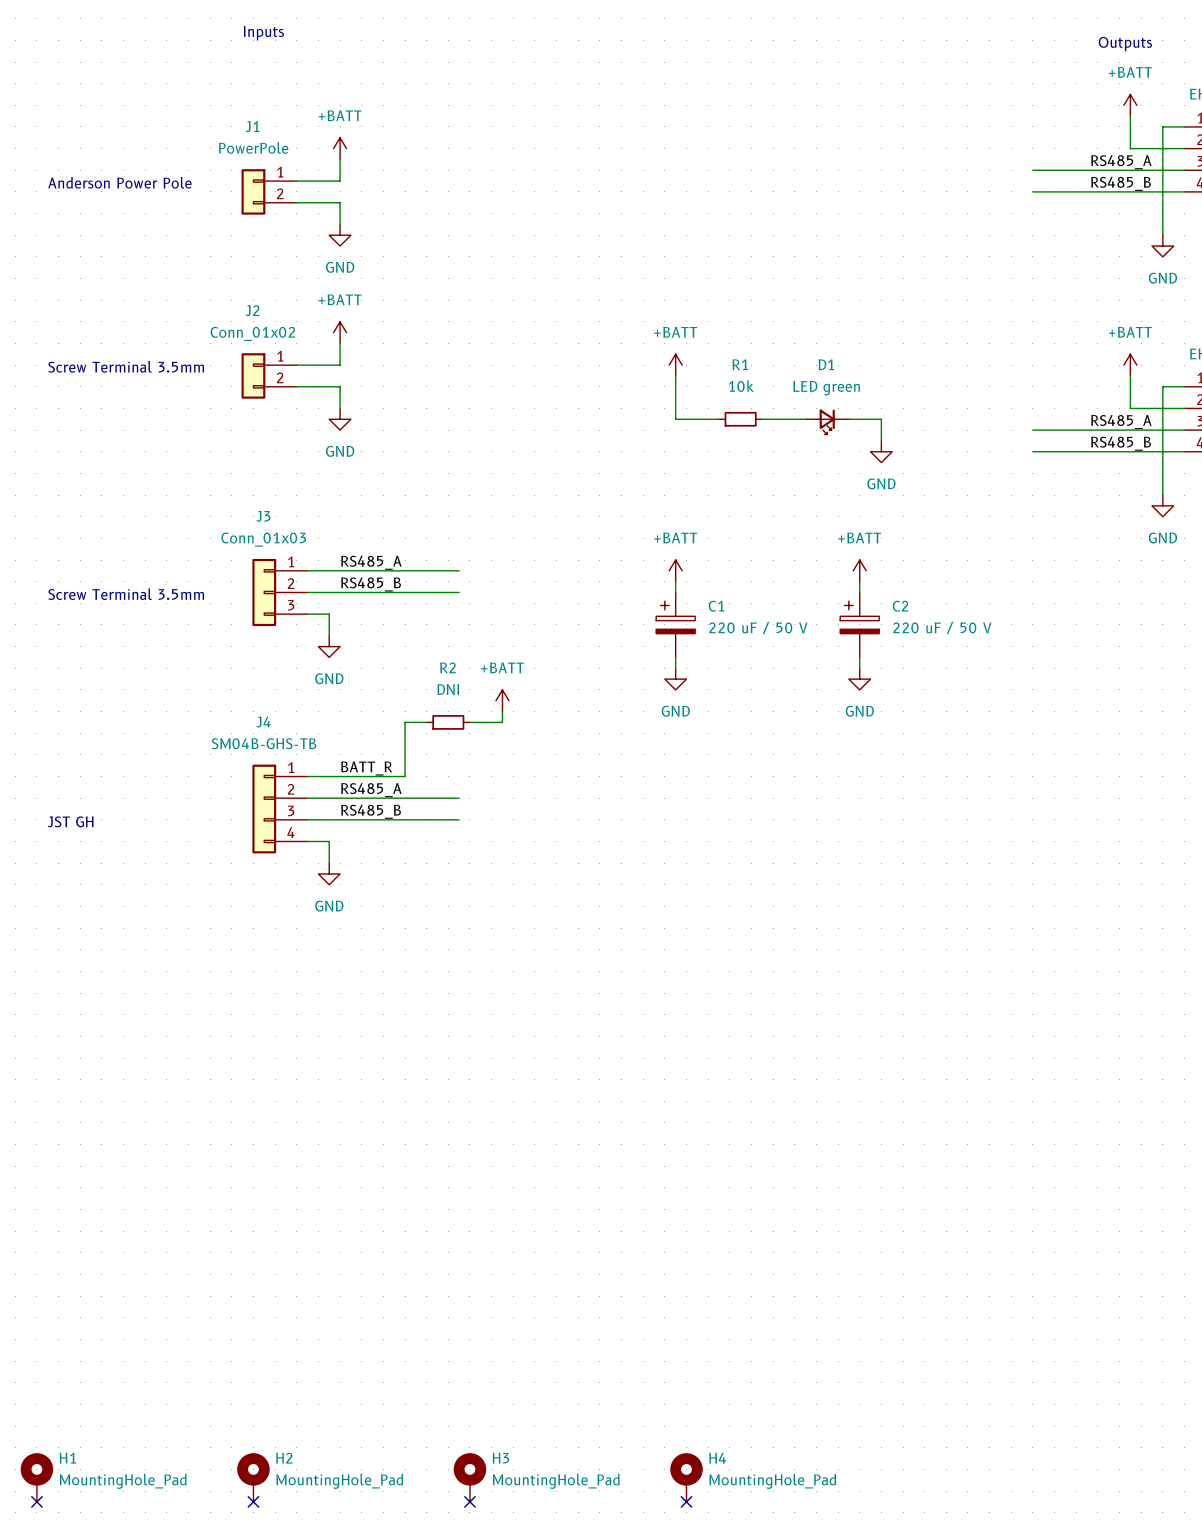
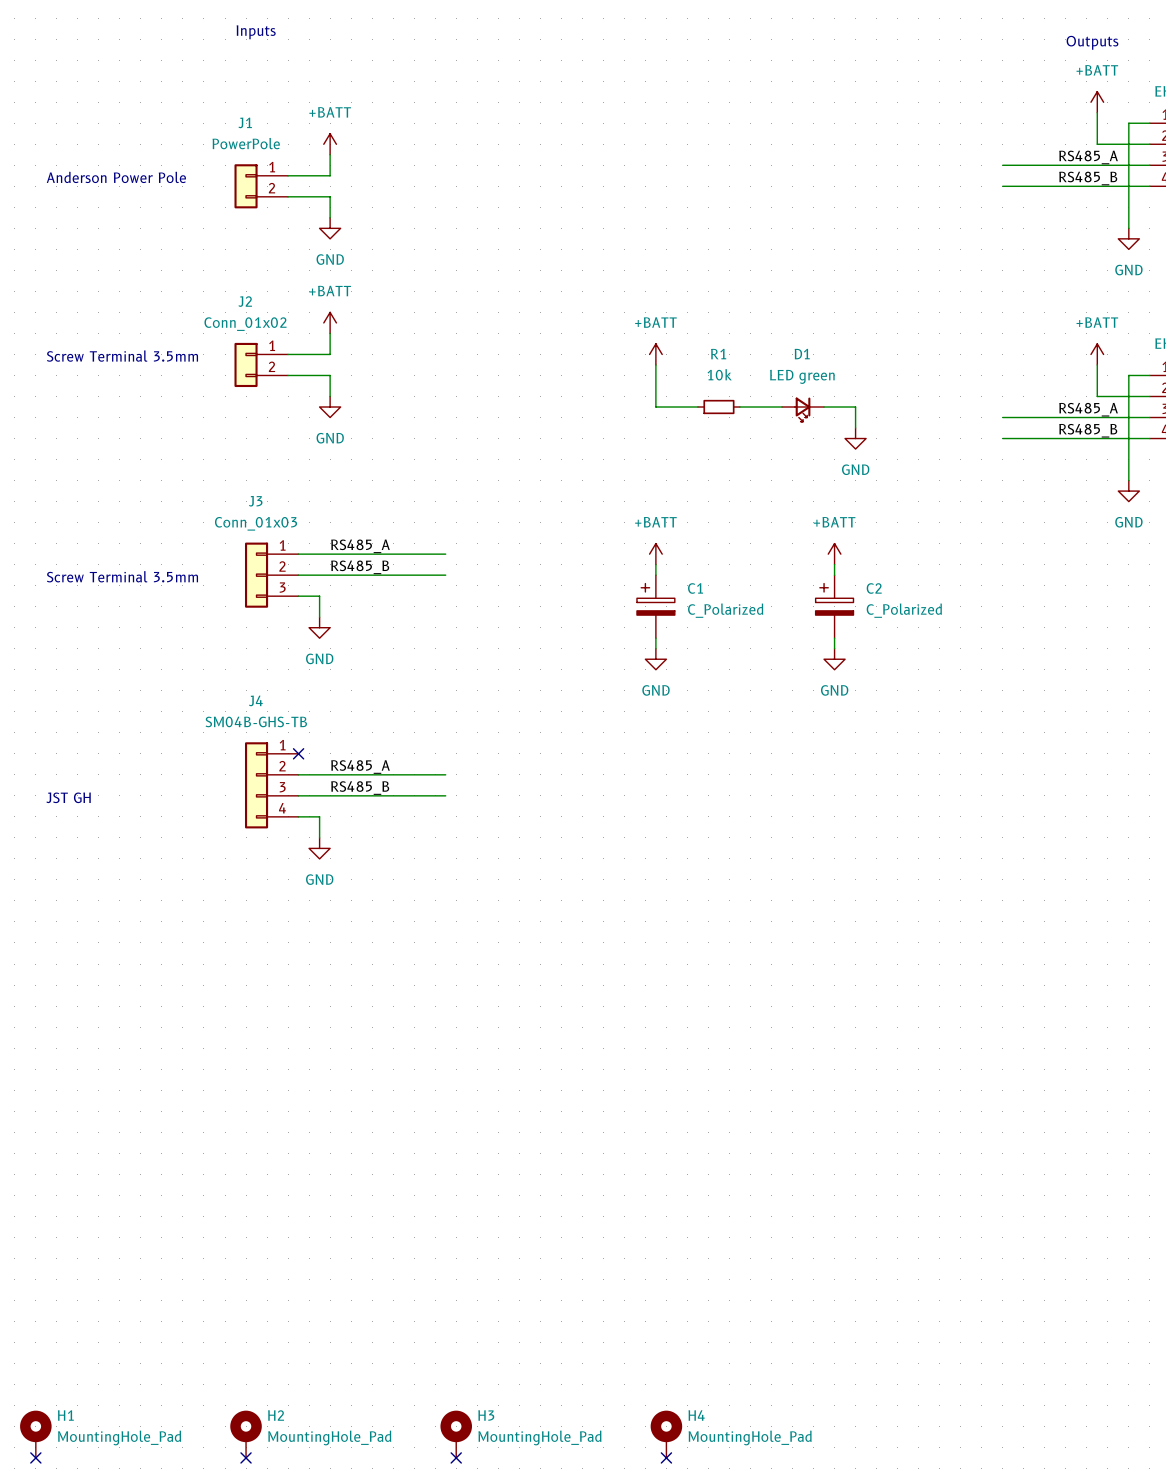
C1 value: 220 uF / 50 V (758, 627) -> C_Polarized (725, 610)
C2 value: 220 uF / 50 V (942, 627) -> C_Polarized (904, 610)
power symbol: +BATT (502, 700) -> none
wire: (502, 711) (502, 722) (469, 722) -> none
wire: (426, 722) (405, 722) (405, 776) (307, 776) -> none
R2: DNI (448, 722) -> none
label: BATT_R (366, 768) -> none
no-connect mark: none -> (298, 753)

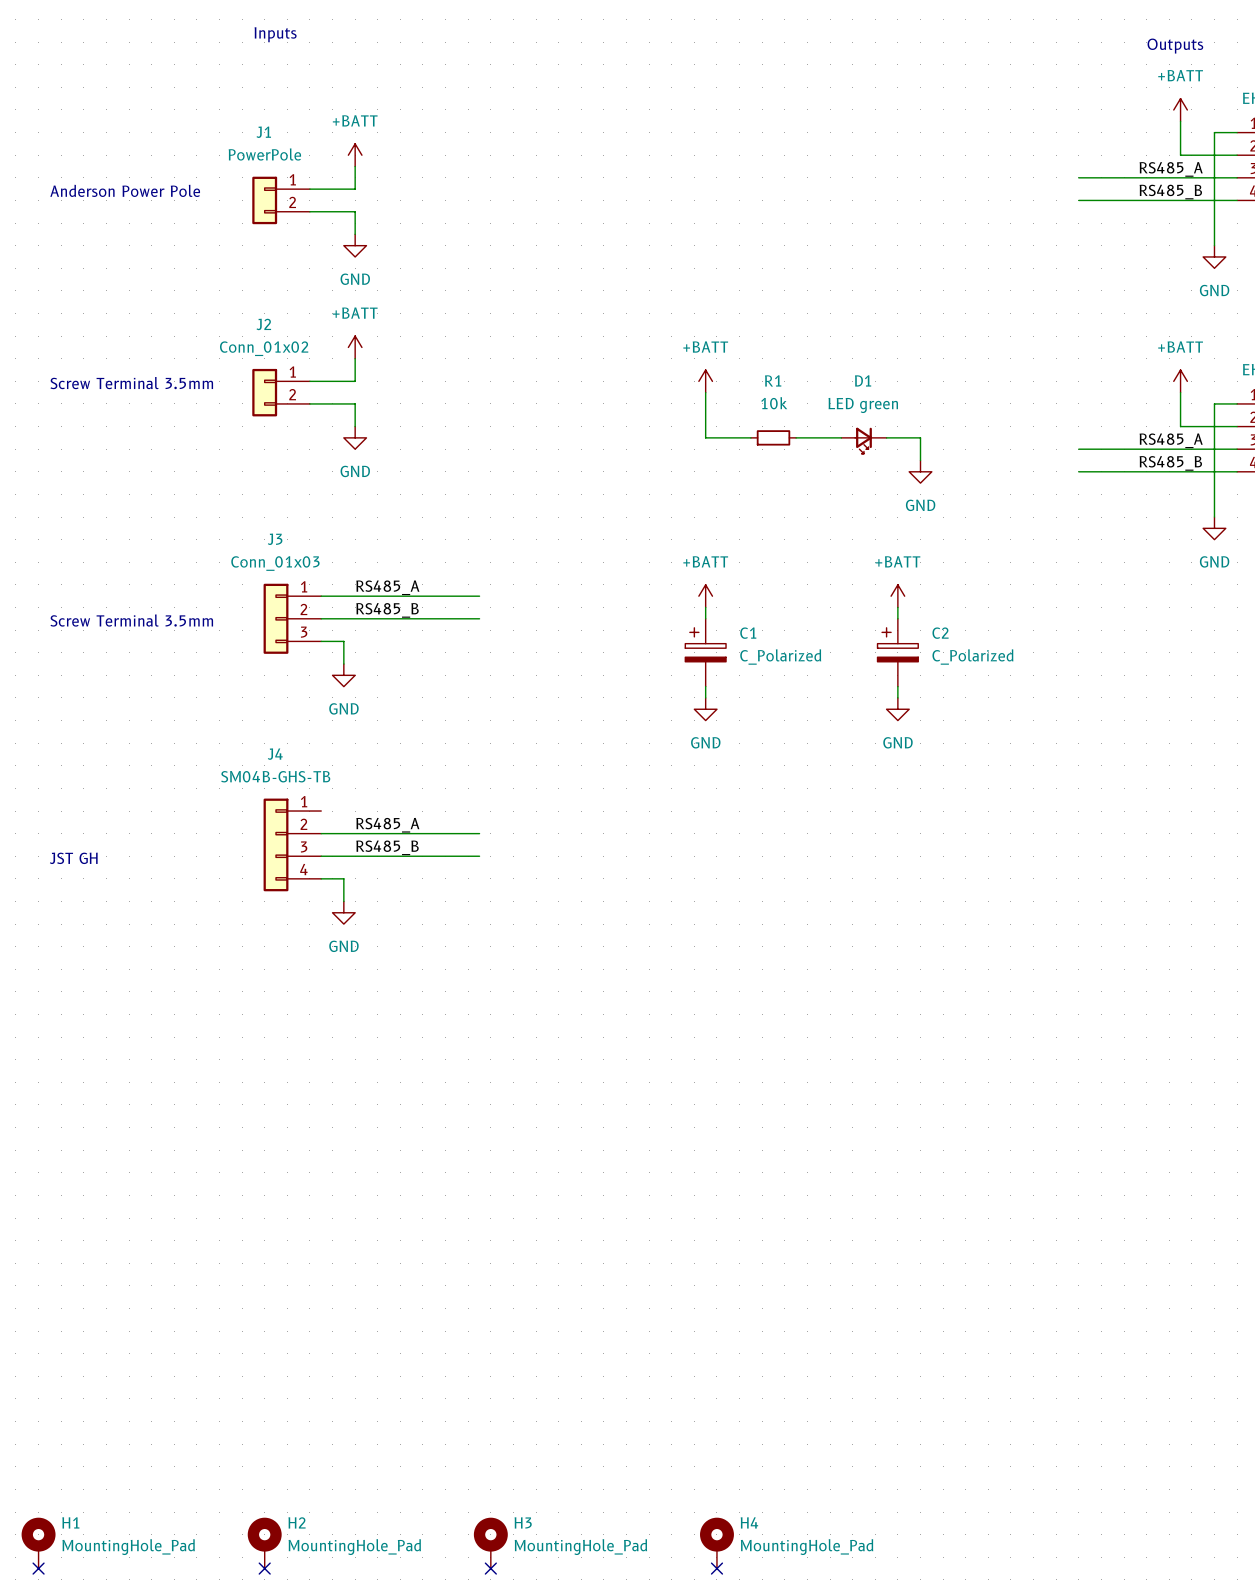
no-connect mark: (298, 753) -> none

